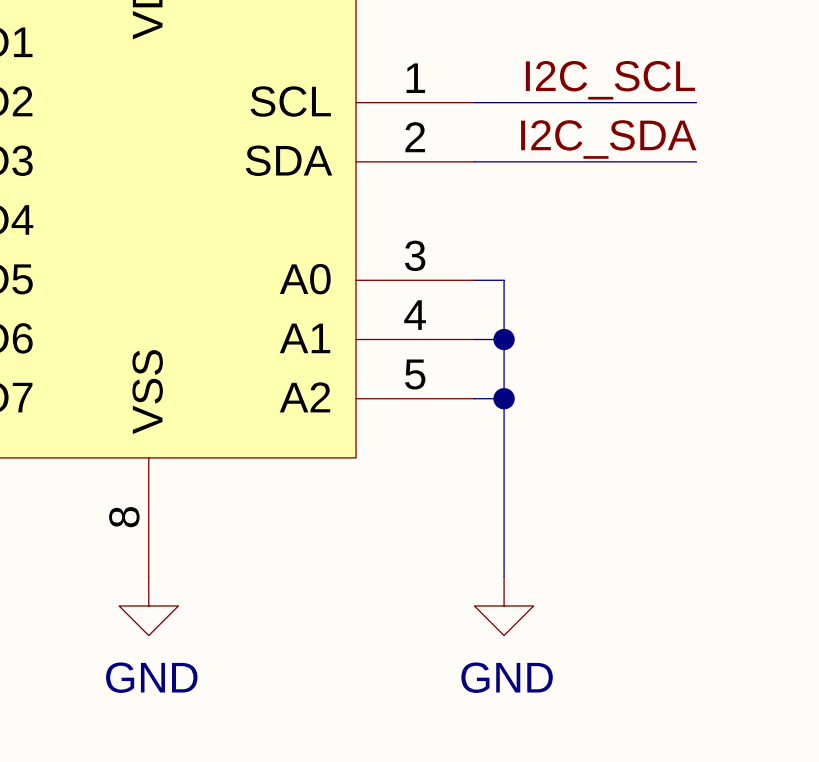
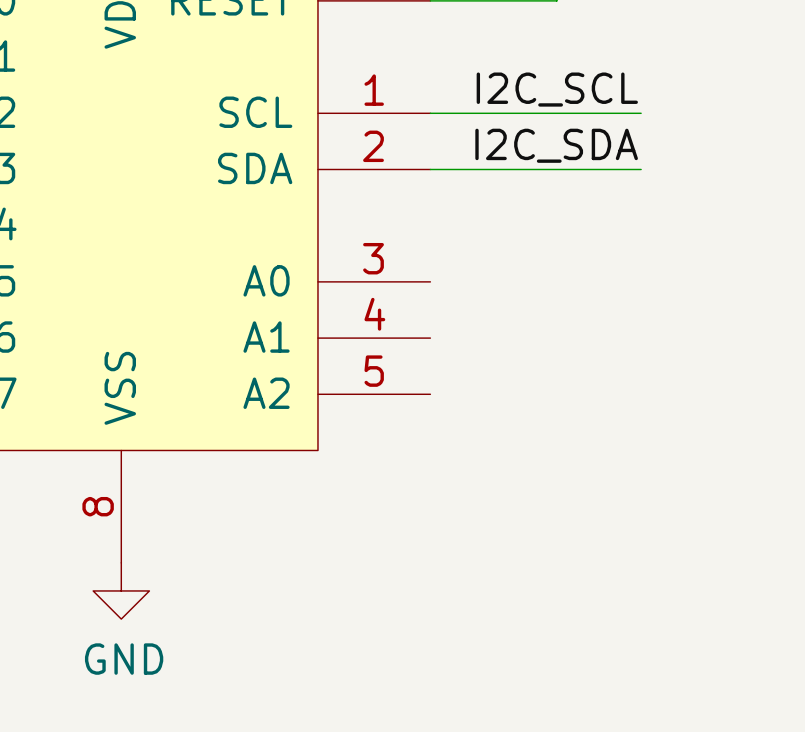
wire: (474, 280) (504, 280) (504, 576) -> none
wire: (474, 339) (504, 339) -> none
junction: (504, 339) -> none
wire: (474, 398) (504, 398) -> none
junction: (504, 398) -> none
power symbol: GND (504, 605) -> none

